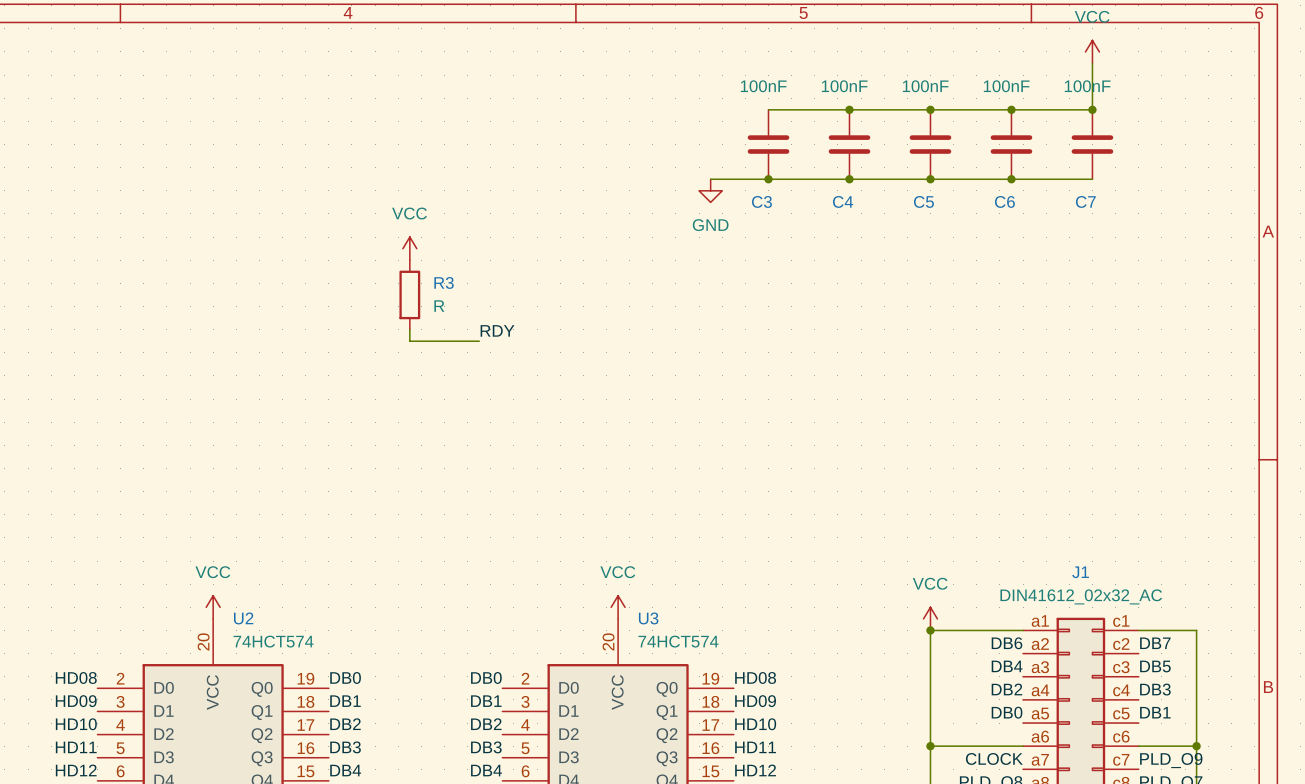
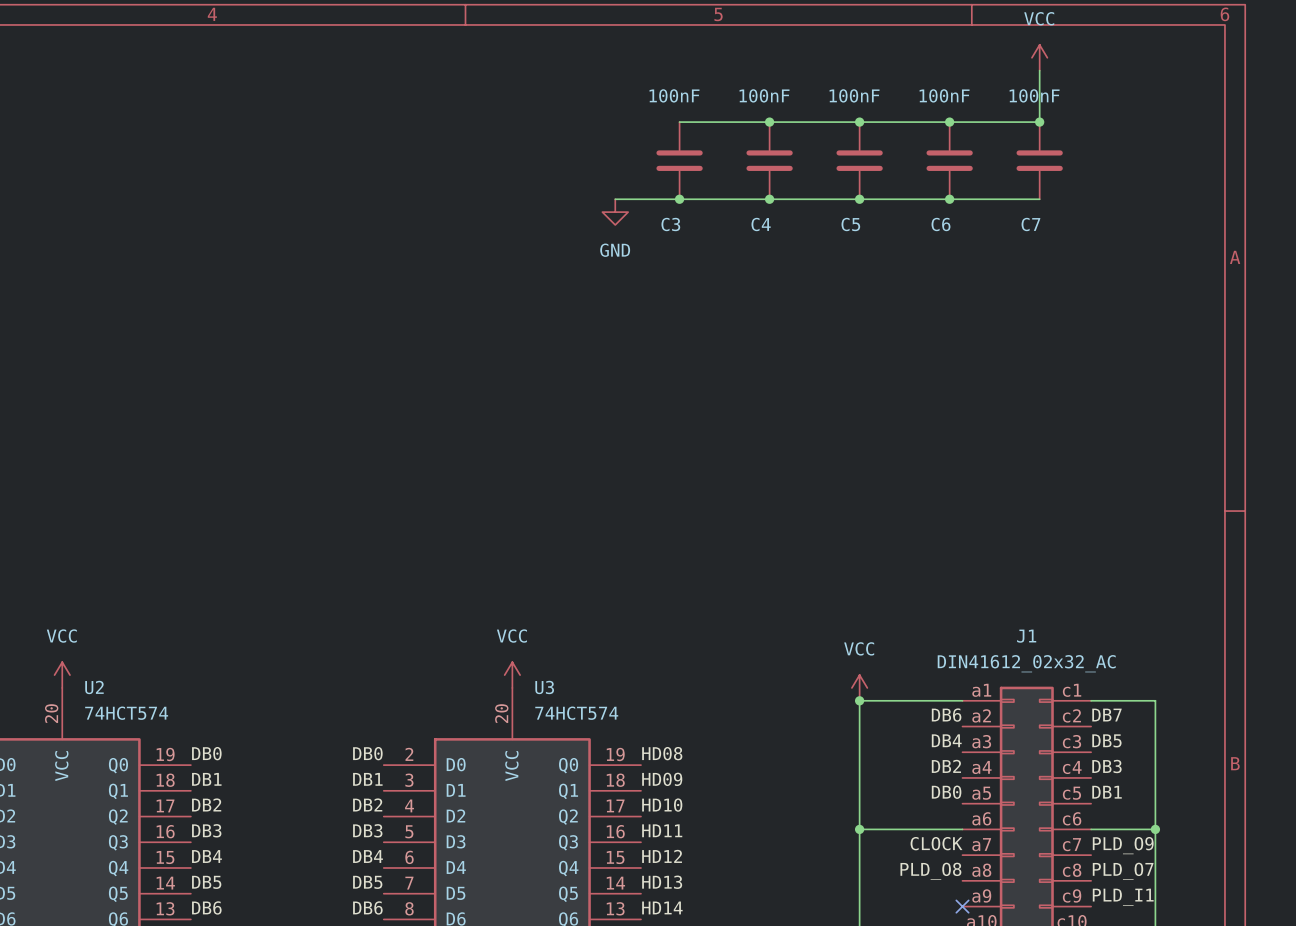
power symbol: VCC (409, 248) -> none
R3: R (409, 294) -> none
wire: (409, 329) (409, 341) (479, 341) -> none
label: RDY (497, 330) -> none

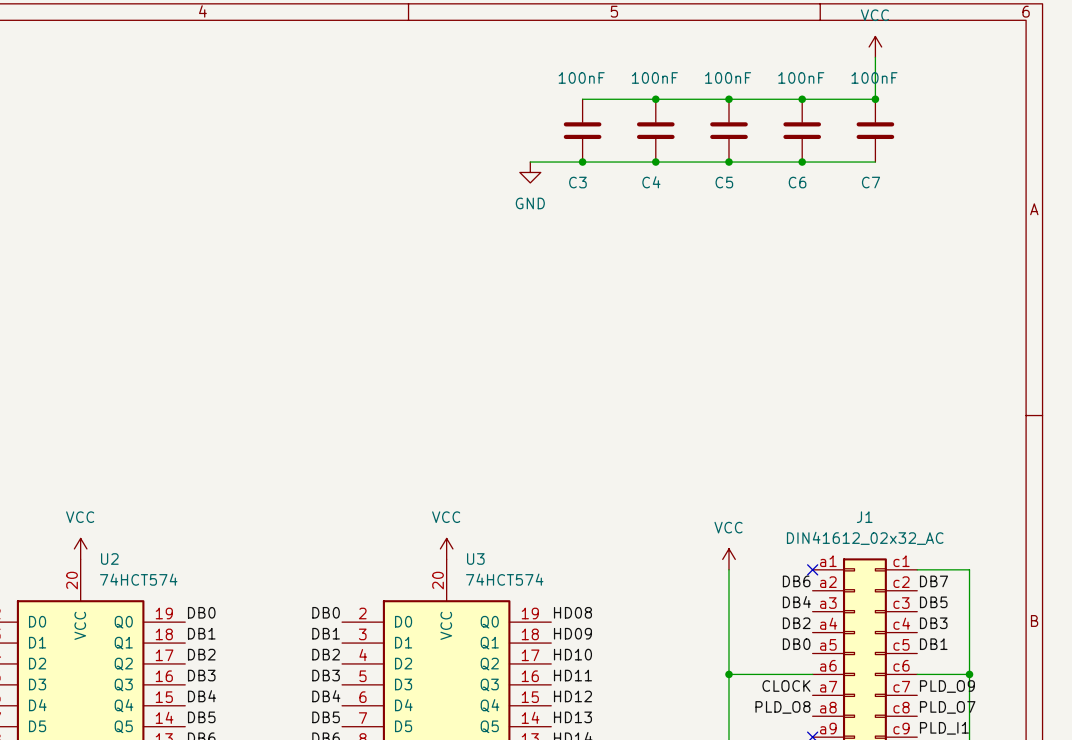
wire: (859, 700) (962, 700) -> none
junction: (859, 700) -> none
no-connect mark: none -> (812, 569)

